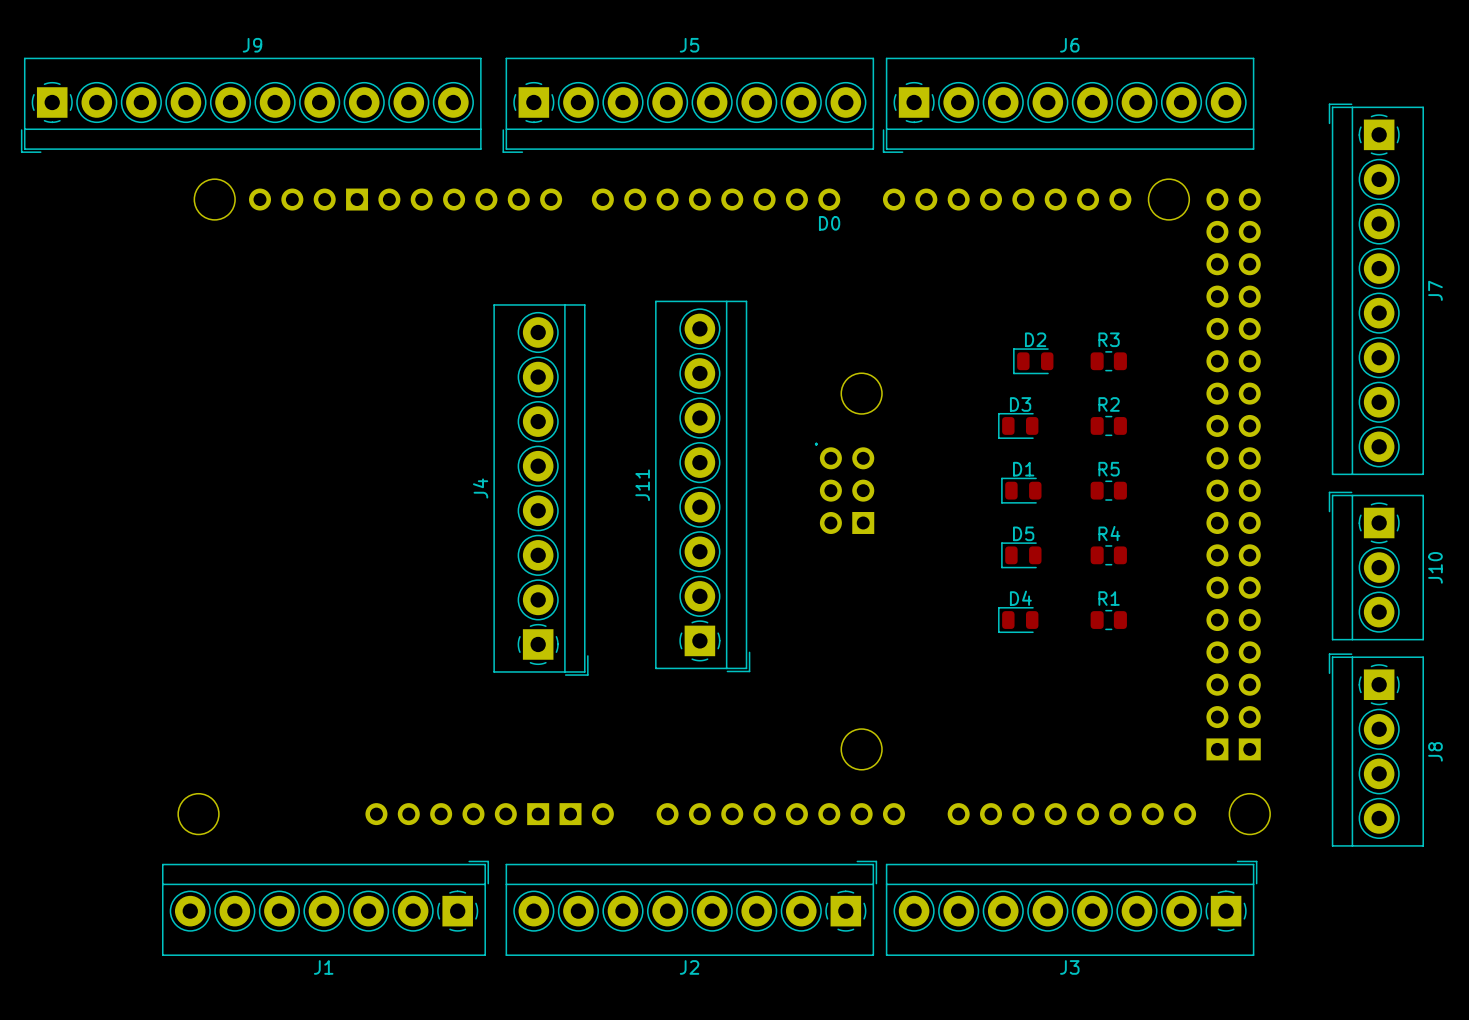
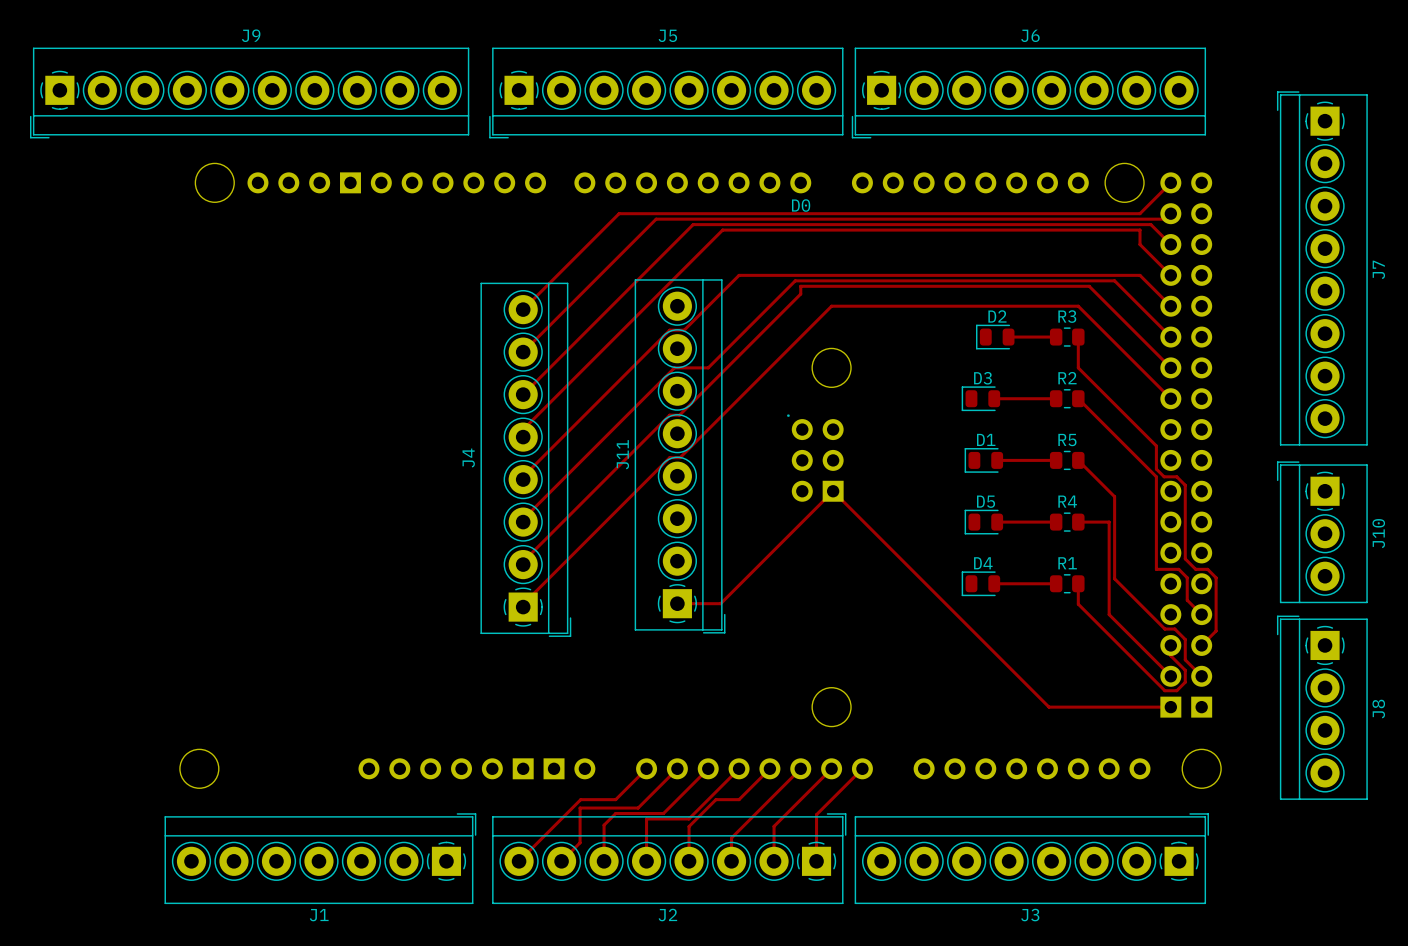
track: none -> (1170, 182) (1140, 213) (619, 213) (523, 309)
track: none -> (1170, 213) (1165, 219) (656, 219) (523, 352)
track: none -> (1170, 244) (1150, 224) (693, 224) (523, 394)
track: none -> (1170, 275) (1140, 244) (1140, 230) (722, 230) (523, 429) (523, 437)
track: none -> (1170, 306) (1140, 275) (739, 275) (684, 330) (669, 330) (523, 476) (523, 479)
track: none -> (1008, 337) (1056, 337)
track: none -> (1078, 337) (1078, 367) (1156, 445) (1156, 469) (1164, 476) (1176, 476) (1185, 485) (1185, 558) (1195, 569) (1207, 569) (1216, 577) (1216, 631) (1201, 645)
track: none -> (1170, 337) (1114, 280) (795, 280) (708, 367) (674, 367) (523, 519) (523, 522)
track: none -> (1170, 367) (1089, 286) (800, 286) (800, 294) (679, 415) (669, 415) (523, 561) (523, 564)
track: none -> (994, 398) (1056, 398)
track: none -> (1078, 398) (1156, 476) (1156, 569) (1178, 569) (1187, 577) (1187, 600) (1201, 614)
track: none -> (1170, 398) (1078, 306) (831, 306) (680, 457) (669, 457) (523, 604) (523, 607)
track: none -> (997, 460) (1056, 460)
track: none -> (1078, 460) (1114, 496) (1114, 578) (1164, 629) (1174, 629) (1185, 639) (1185, 659) (1201, 676)
track: none -> (997, 522) (1056, 522)
track: none -> (1078, 522) (1109, 522) (1109, 614) (1170, 676)
track: none -> (994, 583) (1056, 583)
track: none -> (1078, 583) (1078, 604) (1164, 690) (1176, 690) (1185, 682) (1185, 670) (1170, 655) (1170, 645)
track: none -> (677, 603) (720, 603) (833, 491) (1049, 707) (1170, 707)
track: none -> (646, 768) (615, 799) (580, 799) (519, 861)
track: none -> (677, 768) (638, 808) (580, 808) (580, 842) (561, 861)
track: none -> (708, 768) (663, 813) (615, 813) (604, 825) (604, 861)
track: none -> (739, 768) (688, 818) (646, 818) (646, 861)
track: none -> (769, 768) (739, 799) (715, 799) (689, 826) (689, 861)
track: none -> (800, 768) (731, 838) (731, 861)
track: none -> (831, 768) (774, 826) (774, 861)
track: none -> (862, 768) (816, 814) (816, 861)

